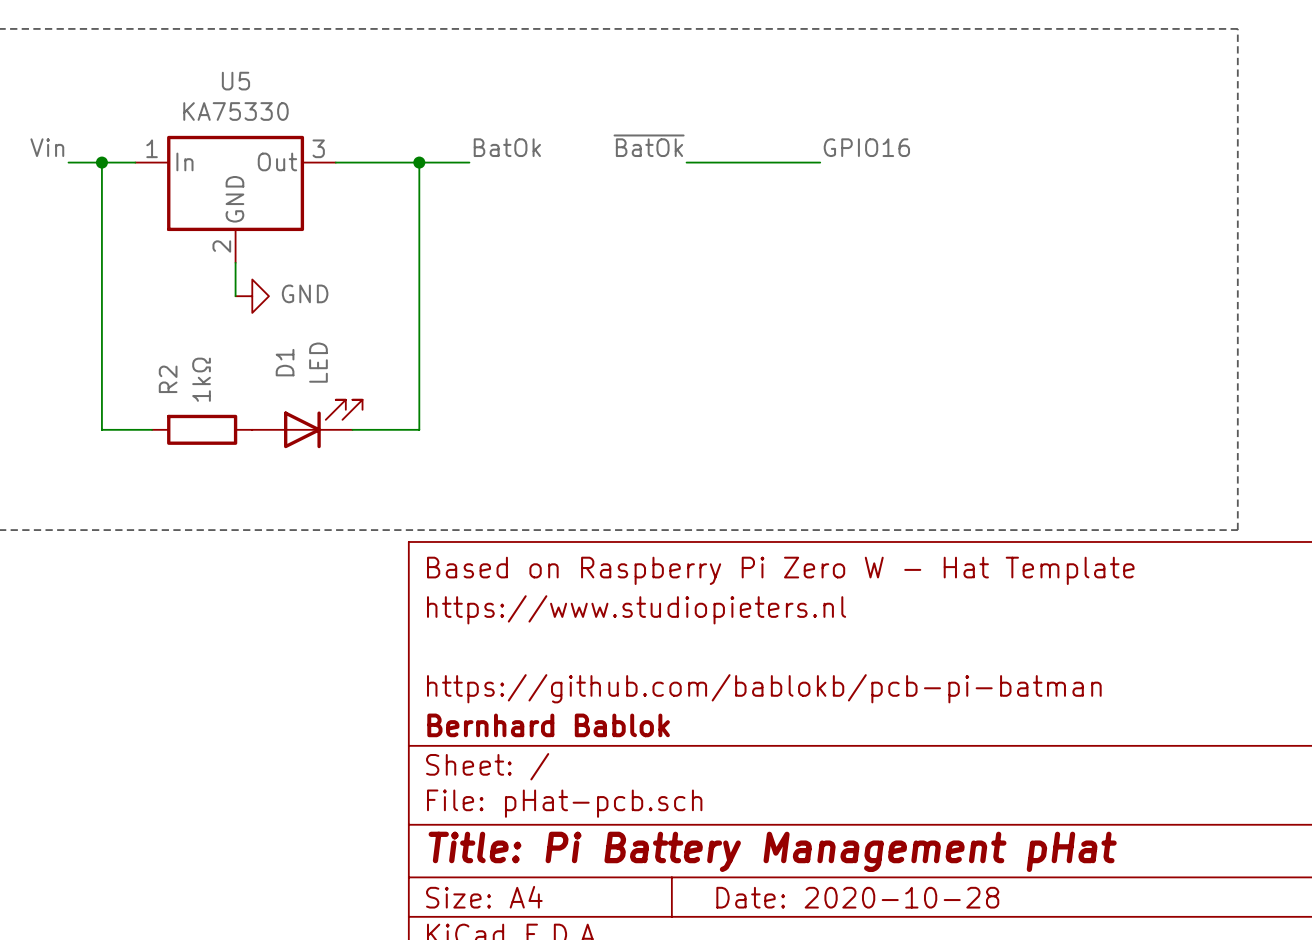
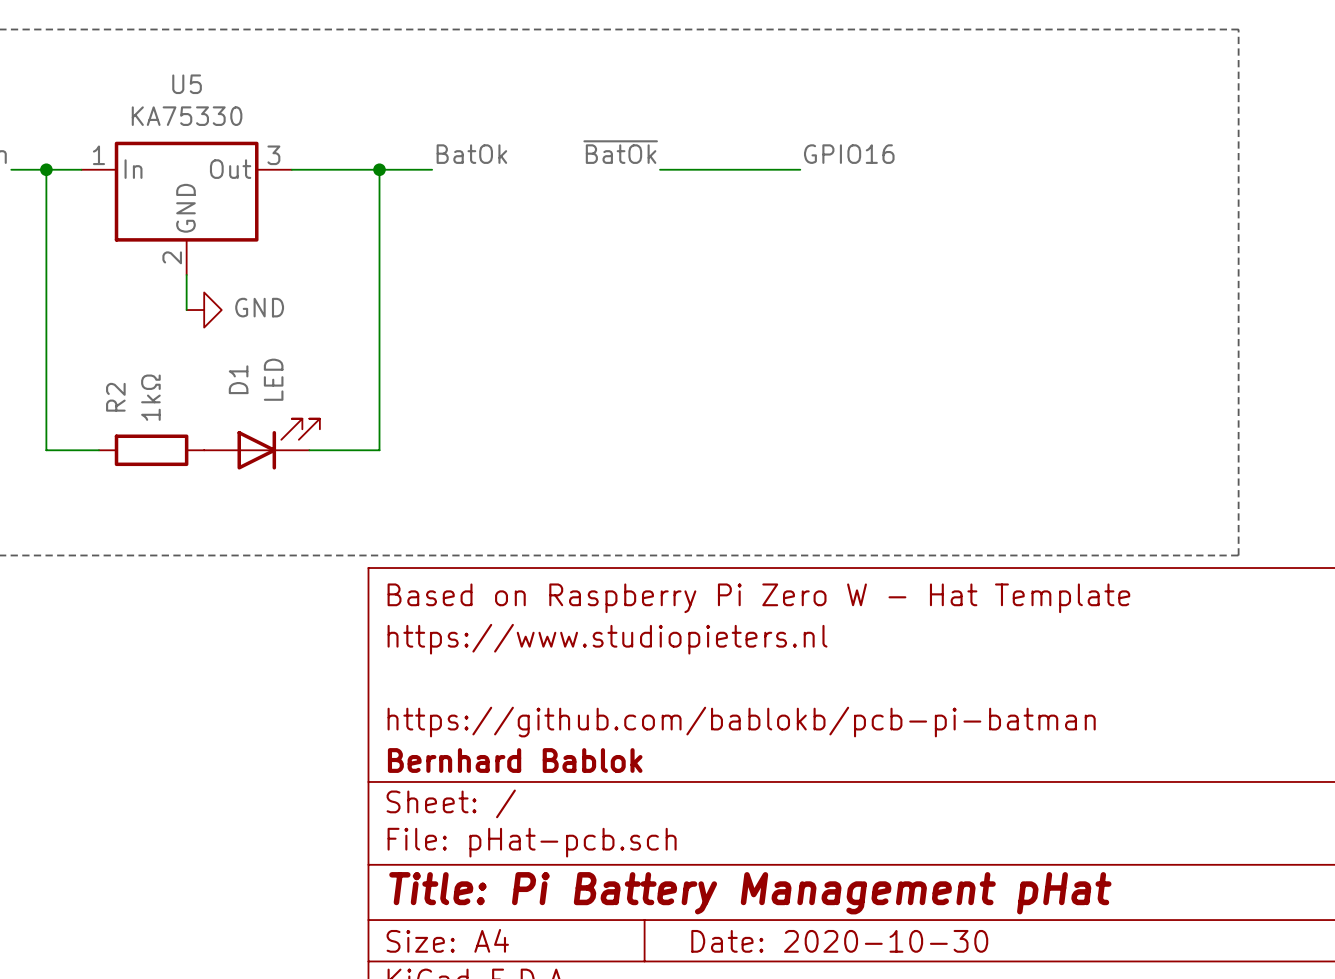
title block: Date: 2020-10-28 (857, 897) -> Date: 2020-10-30 (839, 941)

